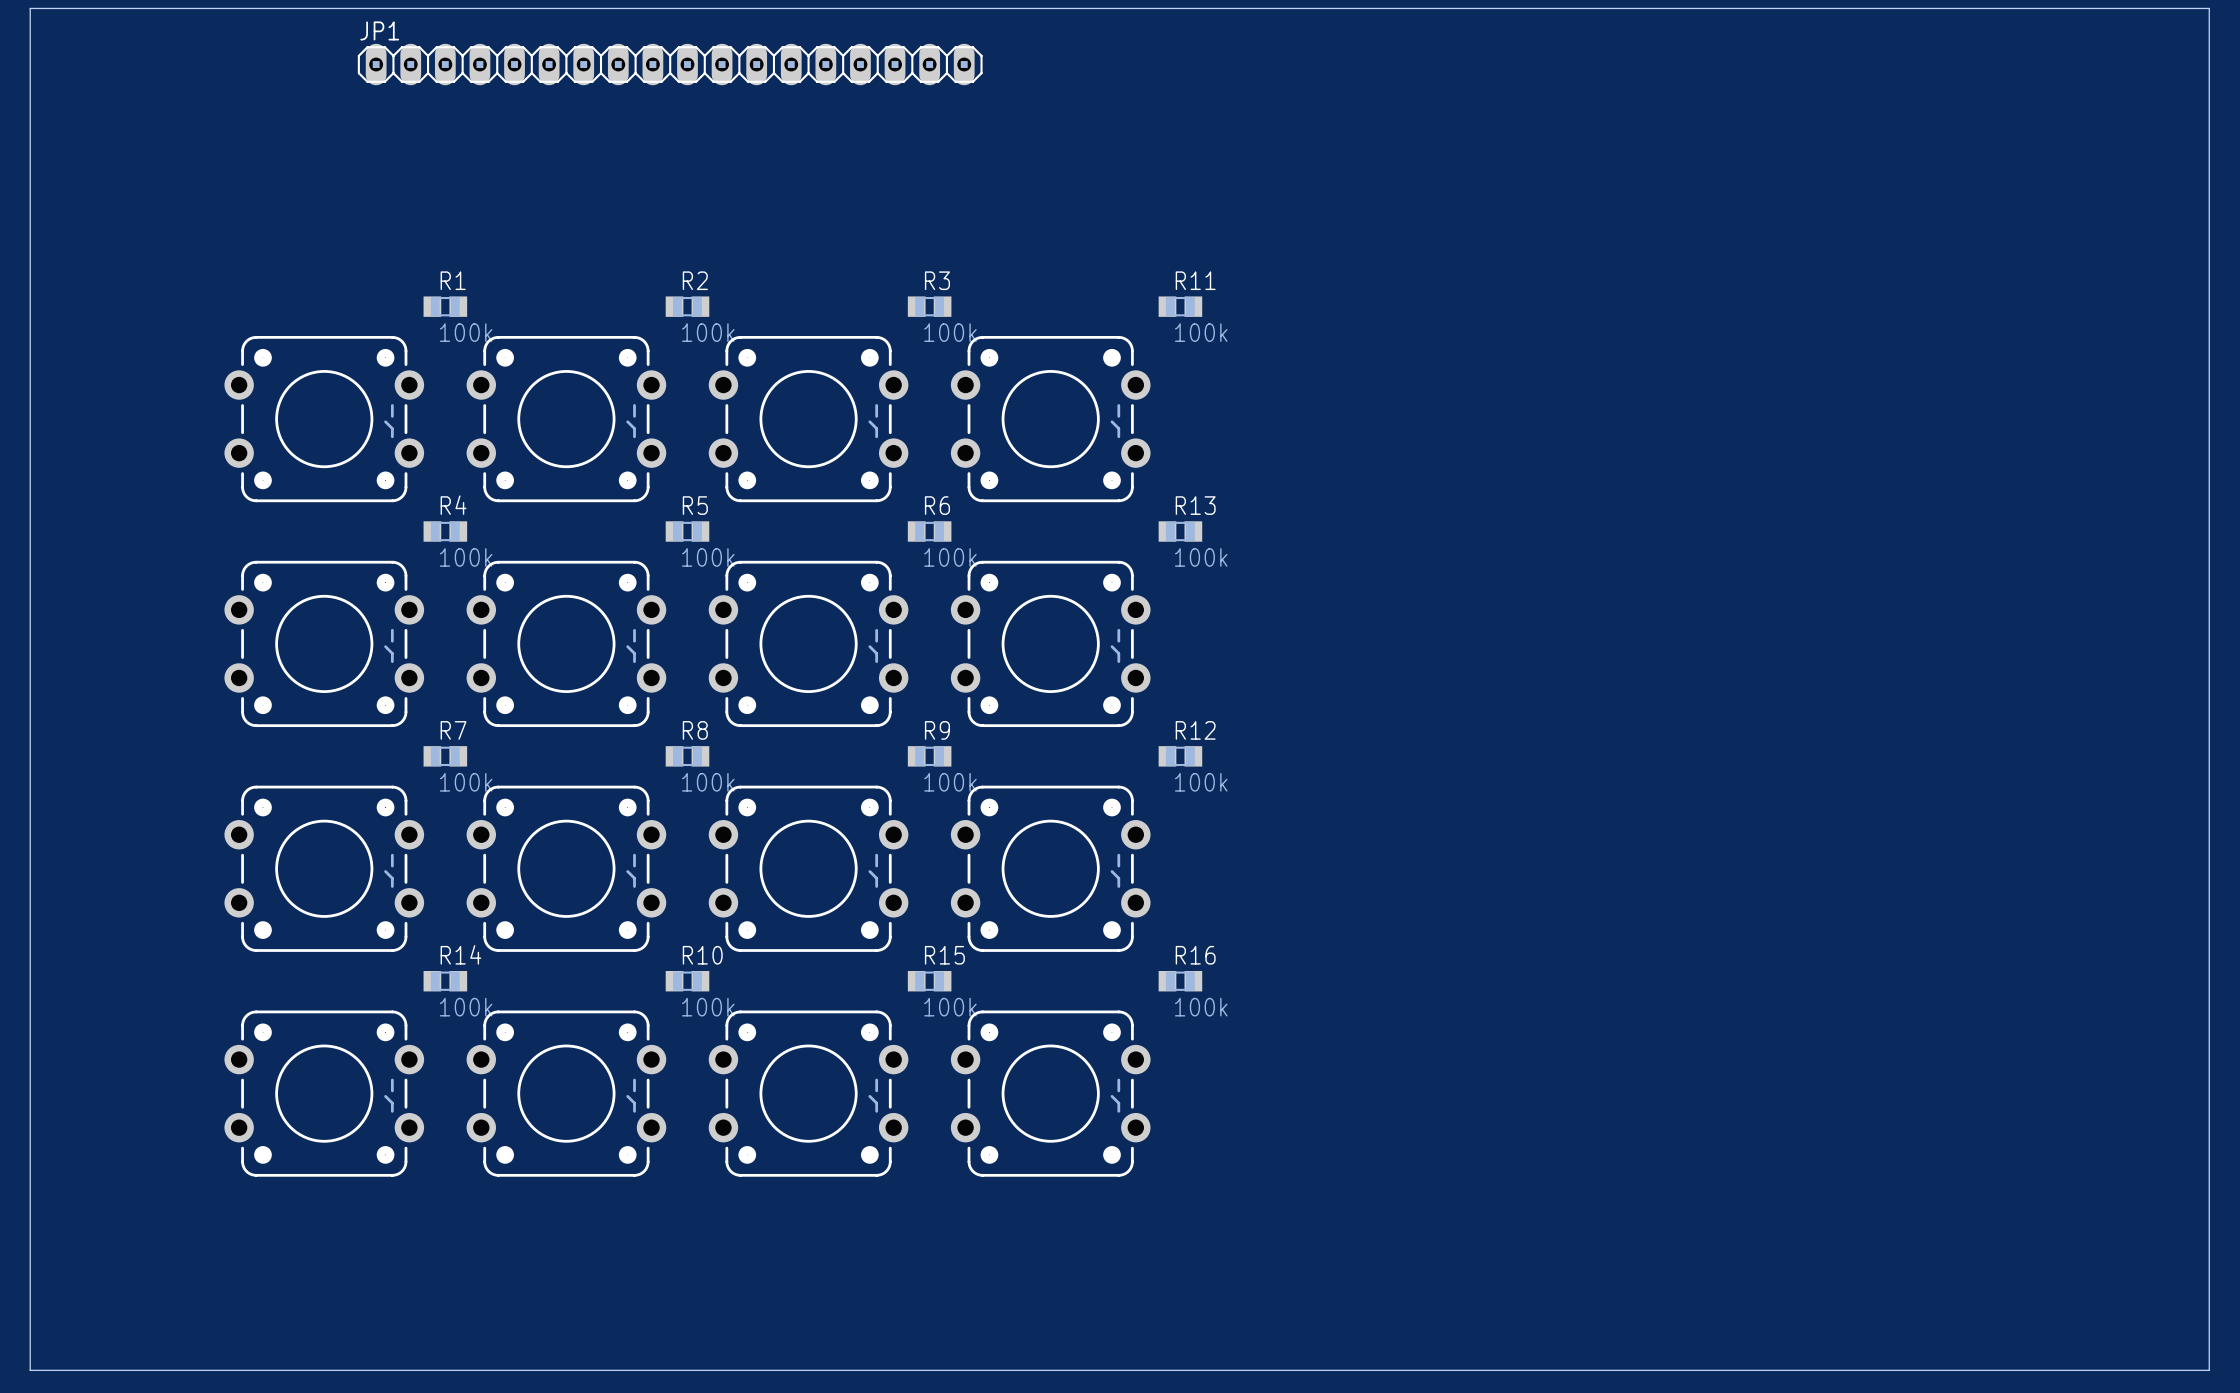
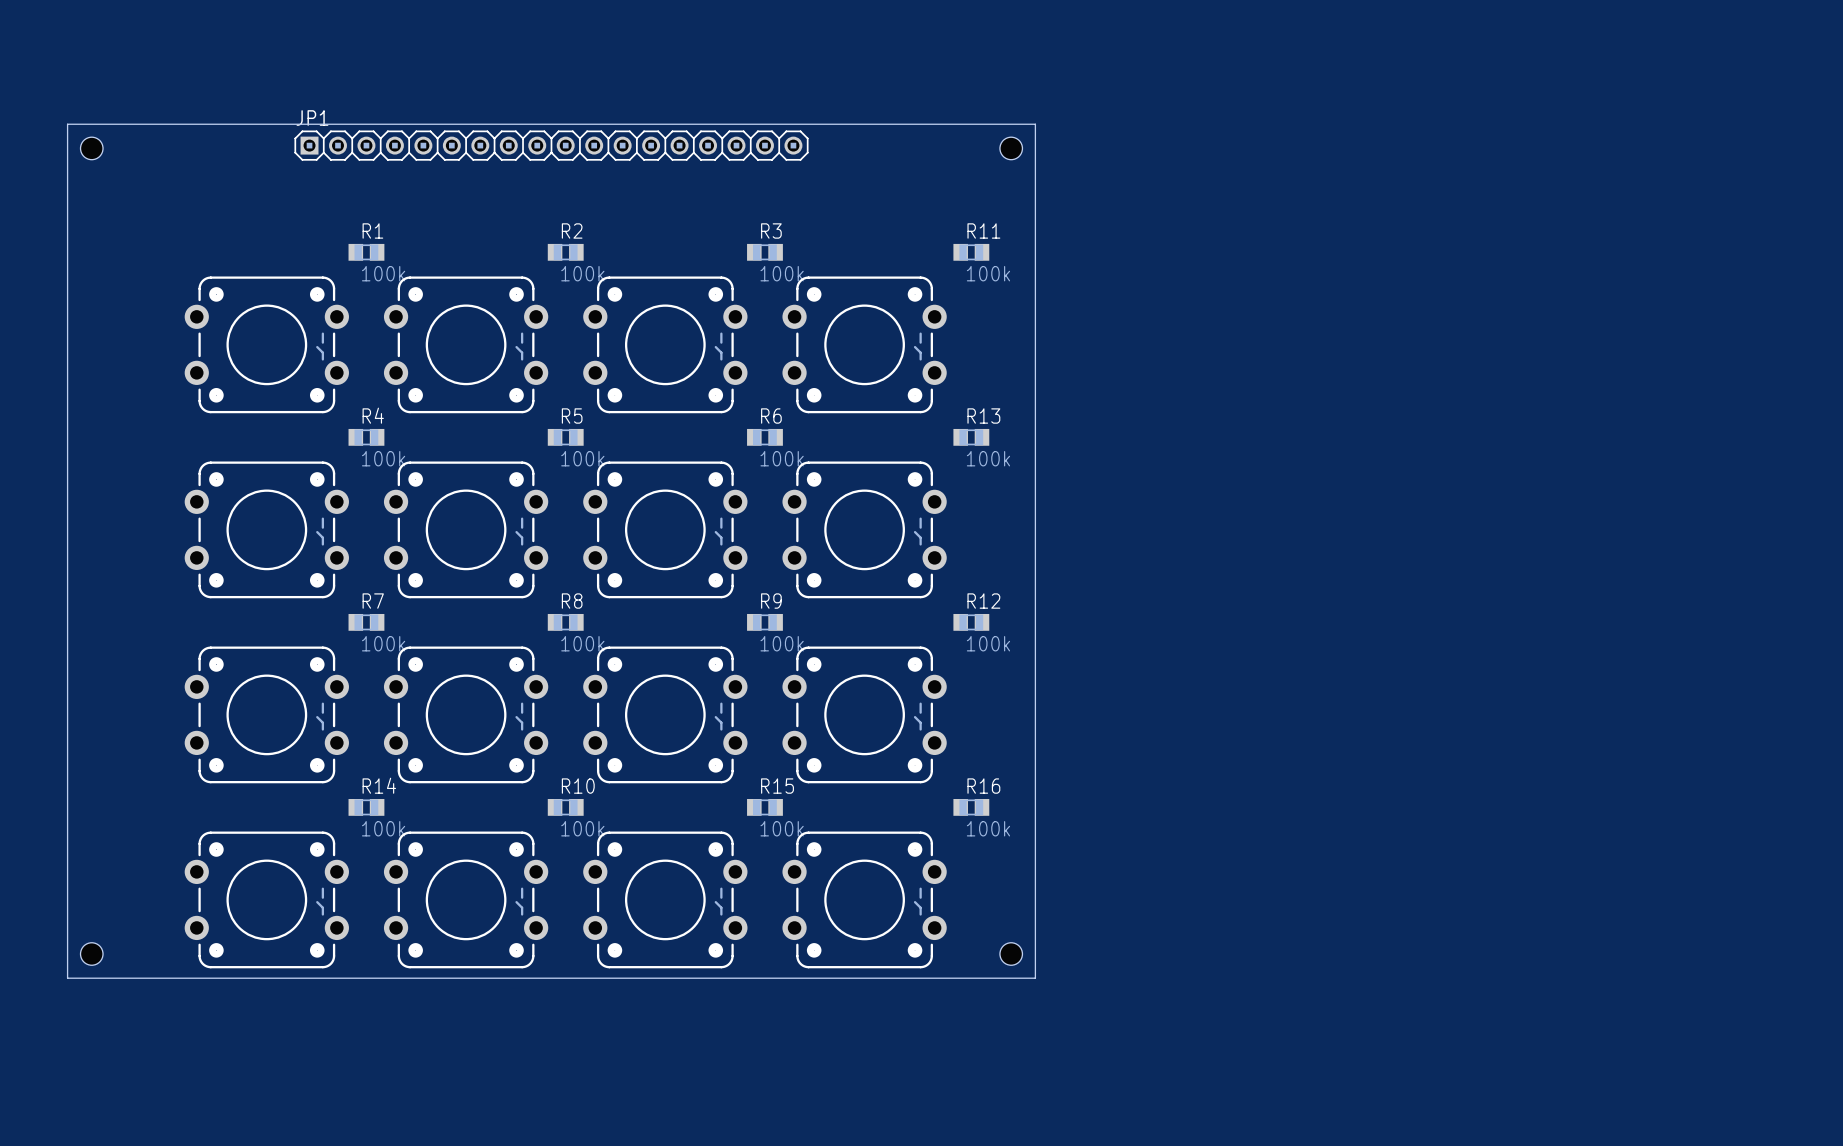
board edge: (30, 8) (2209, 8) (2209, 1370) (30, 1370) (30, 8) -> none
JP1 footprint: [357, 43, 983, 86] -> [294, 130, 809, 161]
board edge: none -> (67, 124) (1035, 124) (1035, 978) (67, 978) (67, 124)
hole: none -> (91, 148)
hole: none -> (1011, 148)
hole: none -> (91, 954)
hole: none -> (1011, 954)

